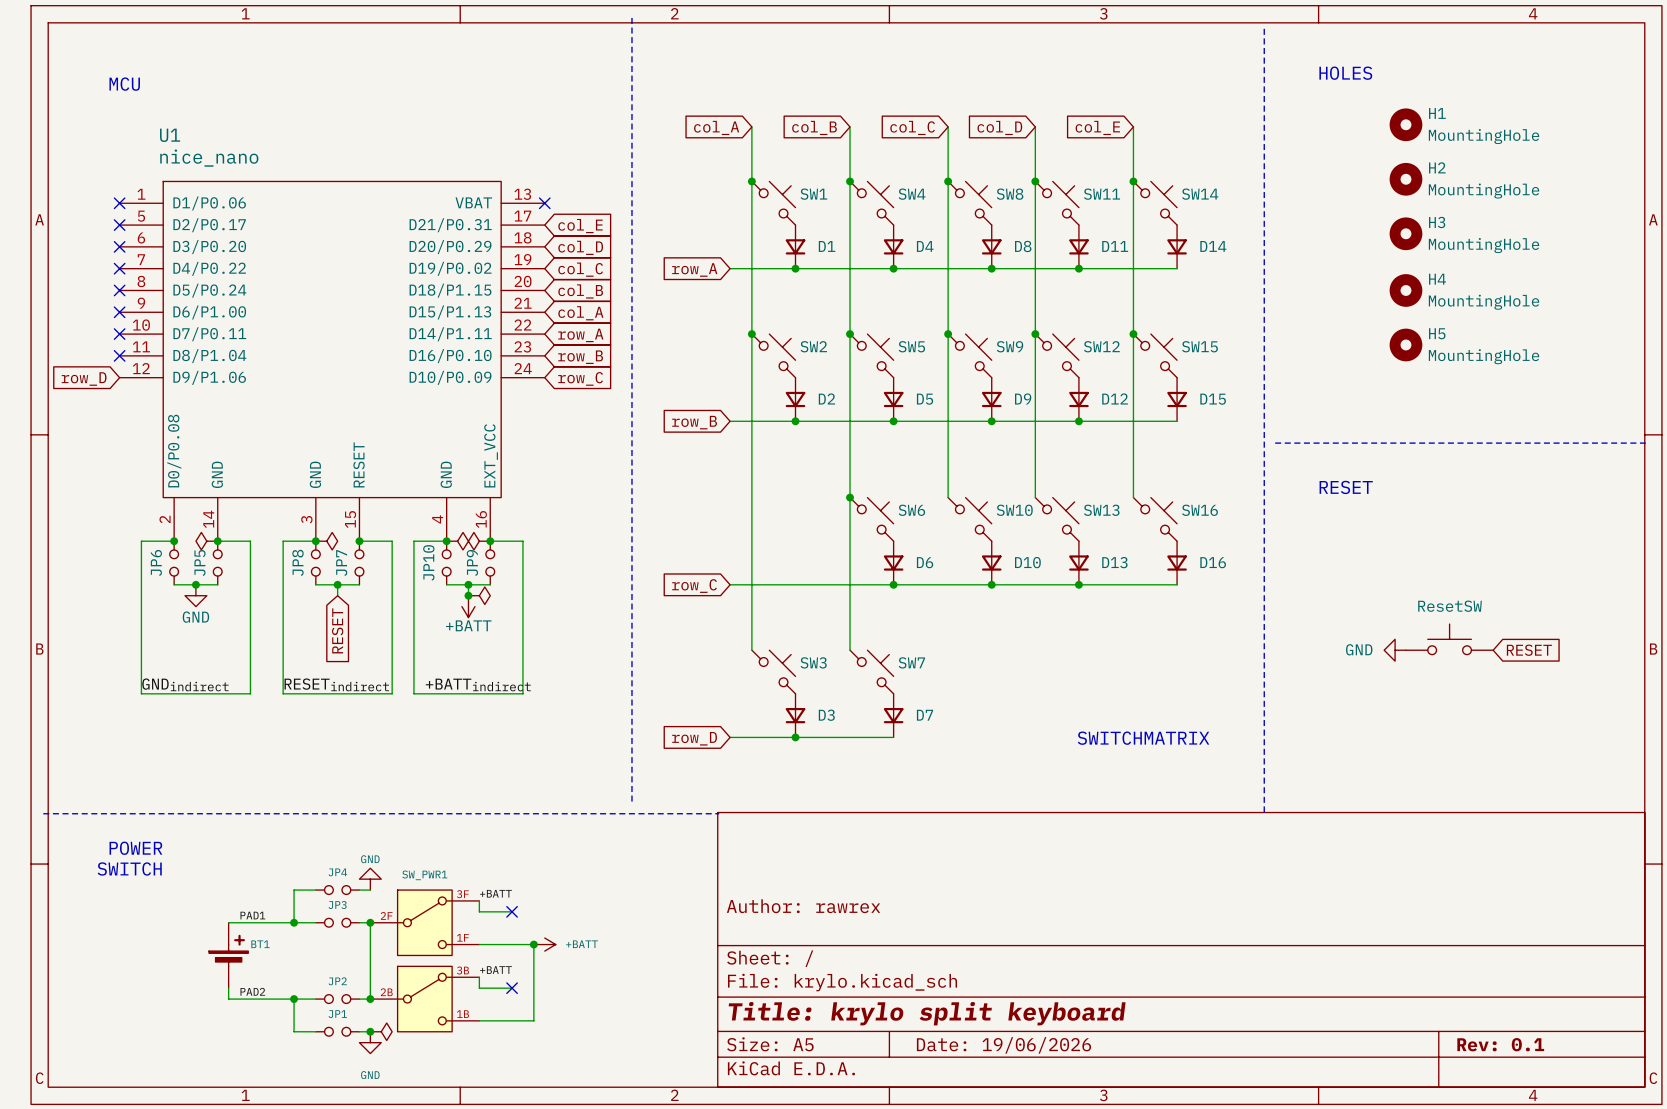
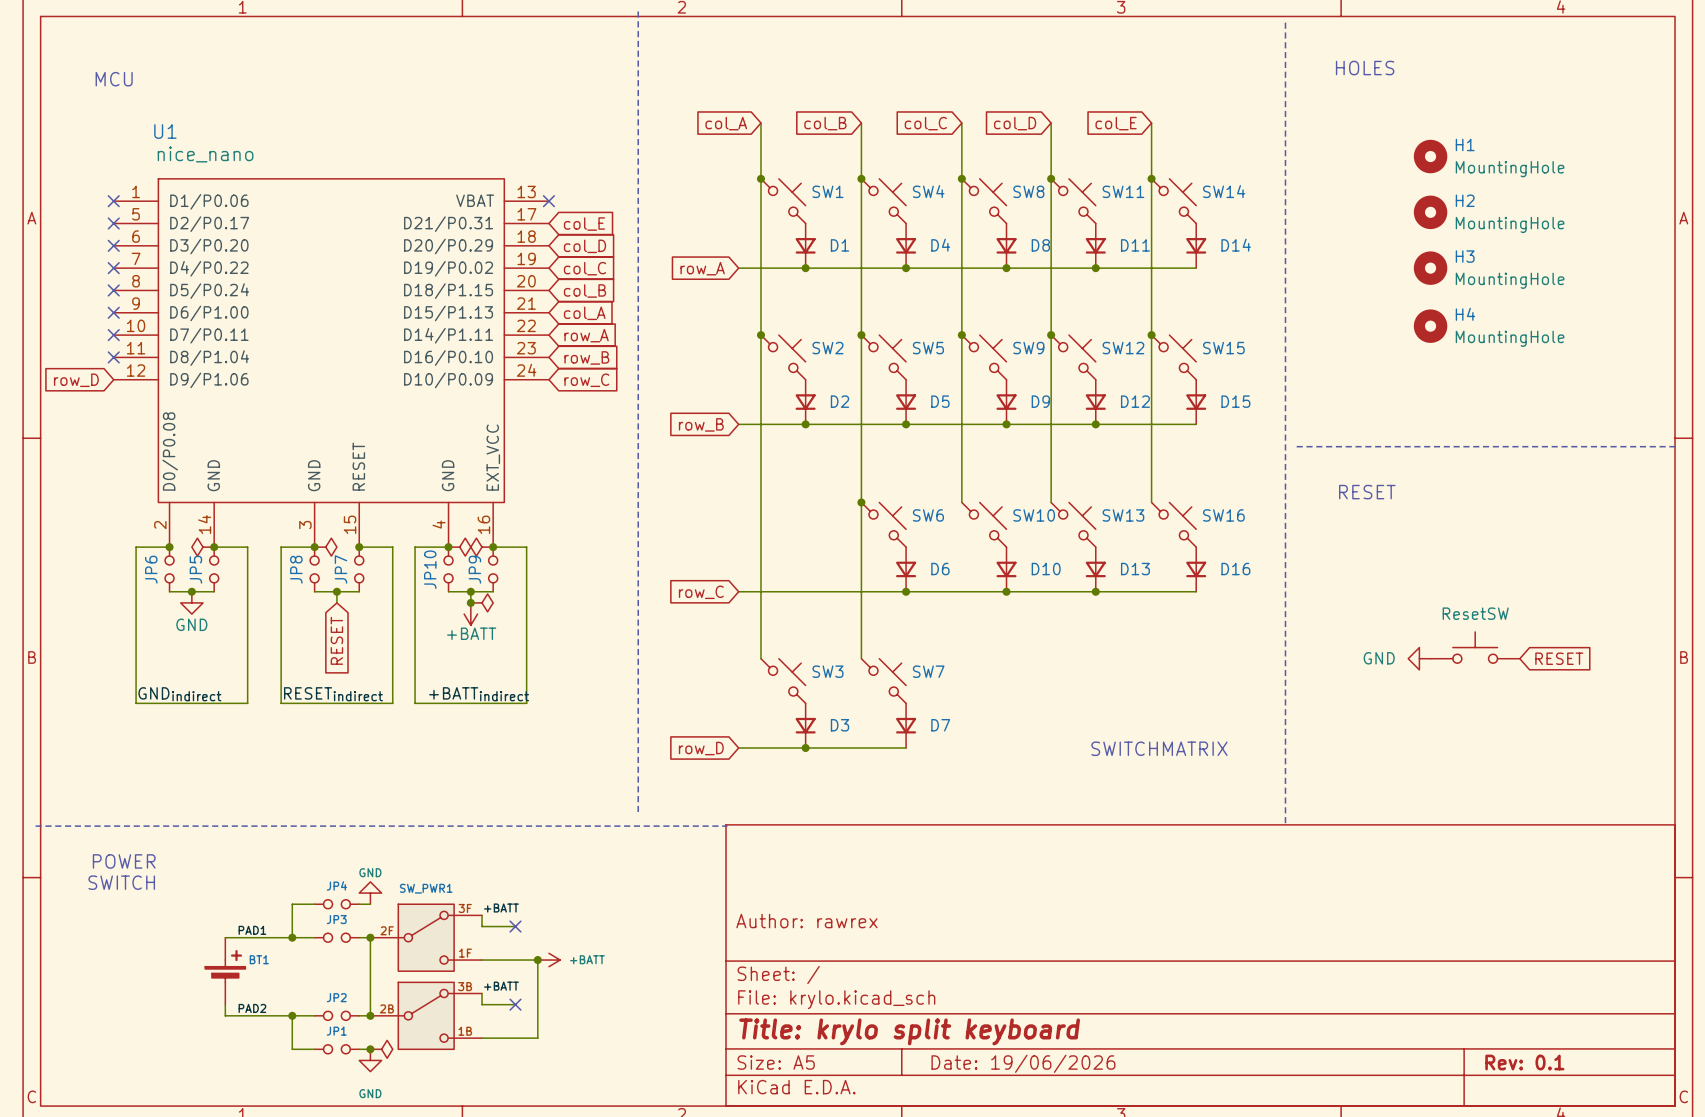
H1 position: (1405, 124) -> (1430, 156)
H2 position: (1405, 179) -> (1430, 212)
H3 position: (1405, 233) -> (1430, 268)
H4 position: (1405, 290) -> (1430, 326)
H5: MountingHole (1405, 344) -> none

